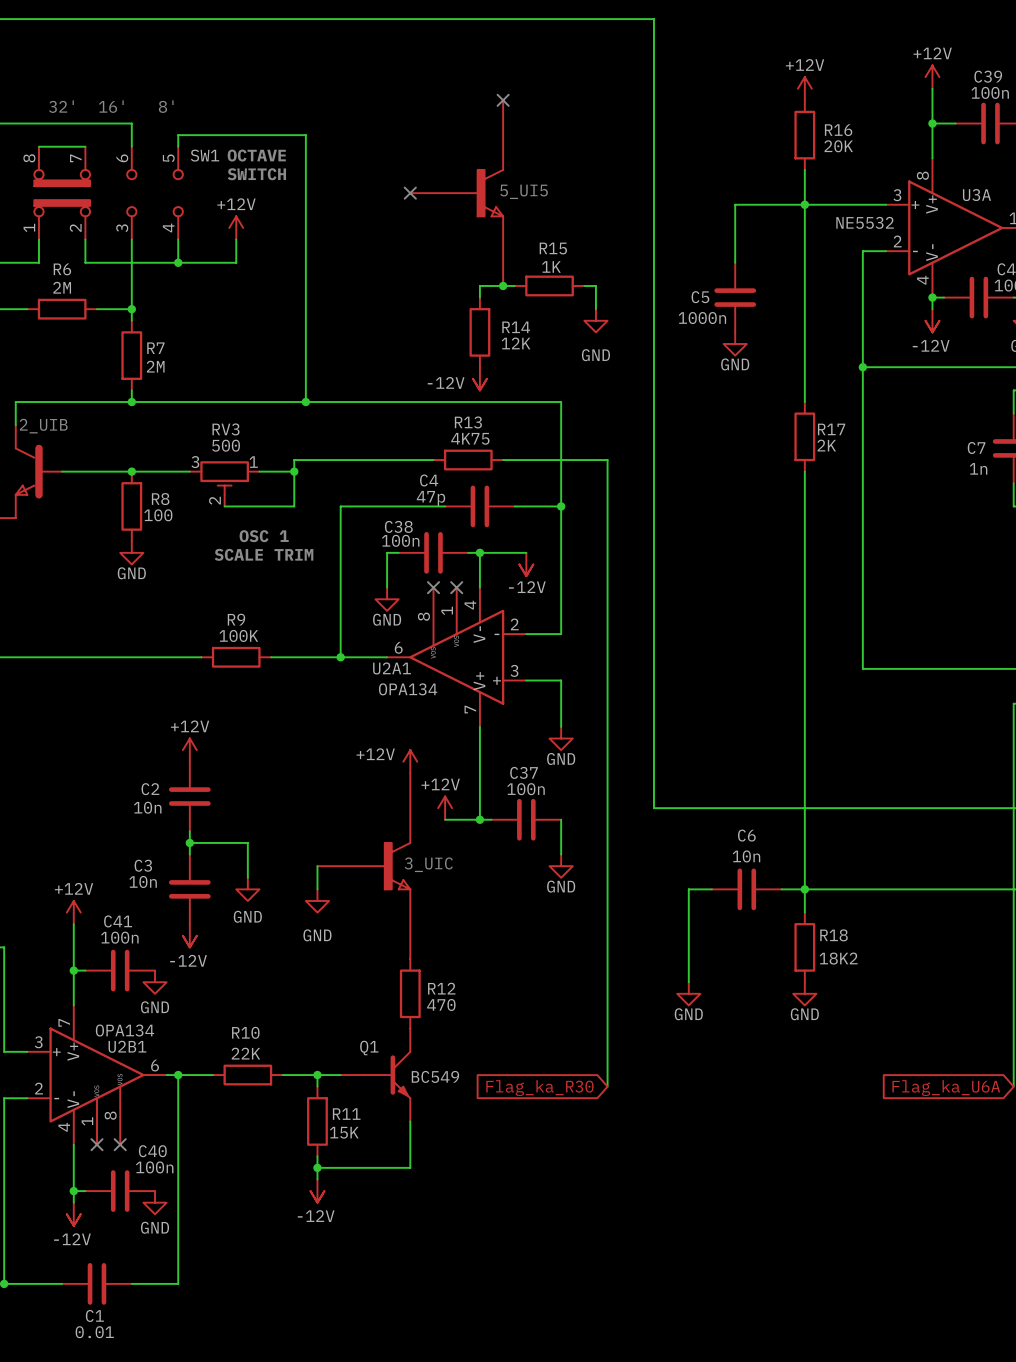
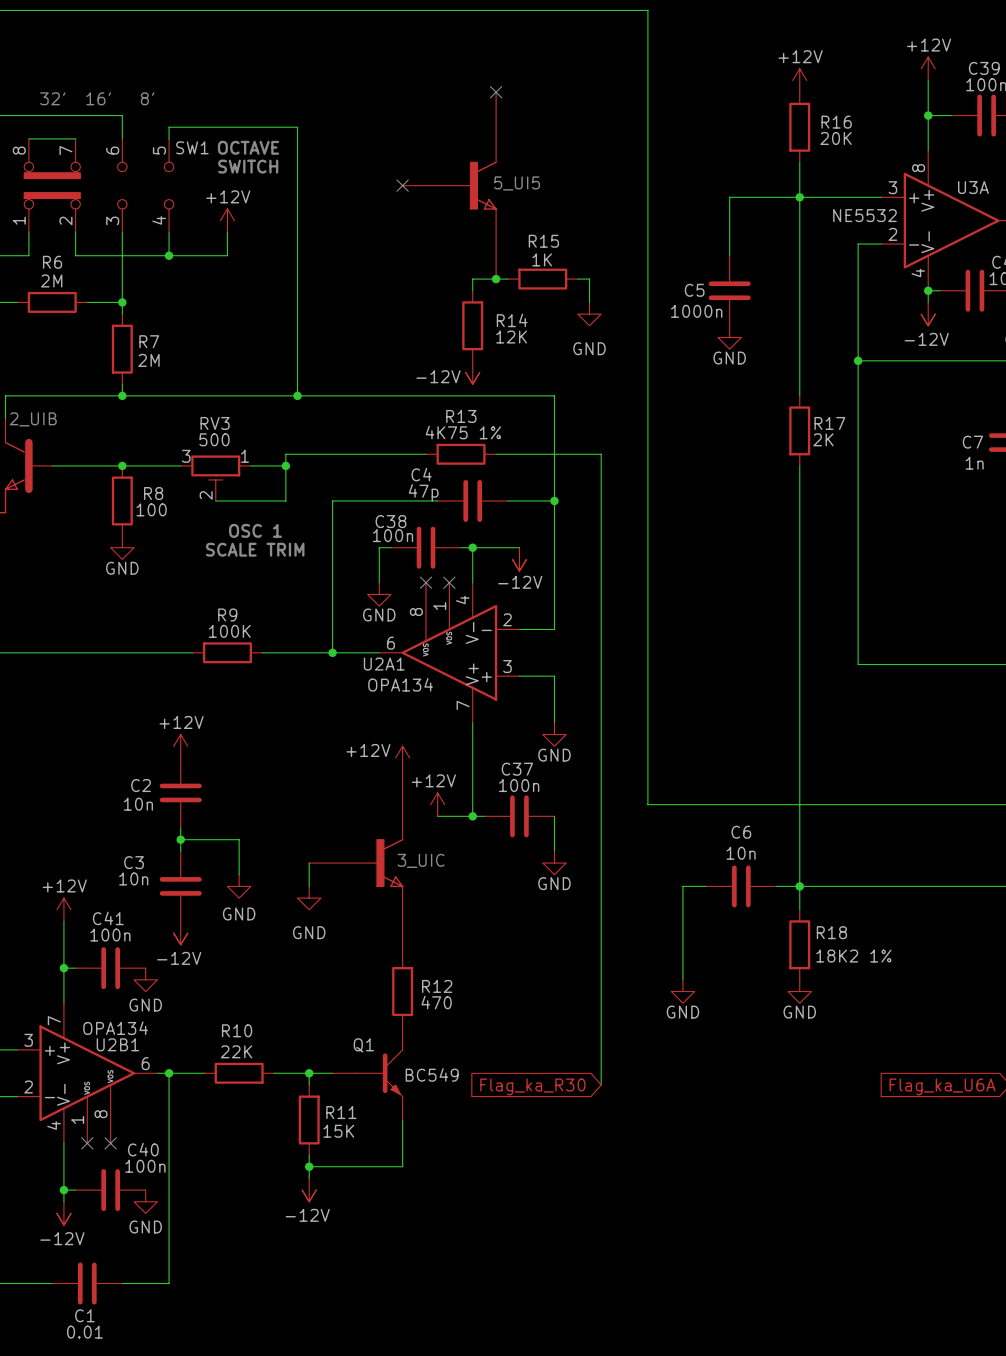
R13 value: 4K75 (470, 438) -> 4K75 1% (463, 432)
R18 value: 18K2 (838, 958) -> 18K2 1% (853, 956)

